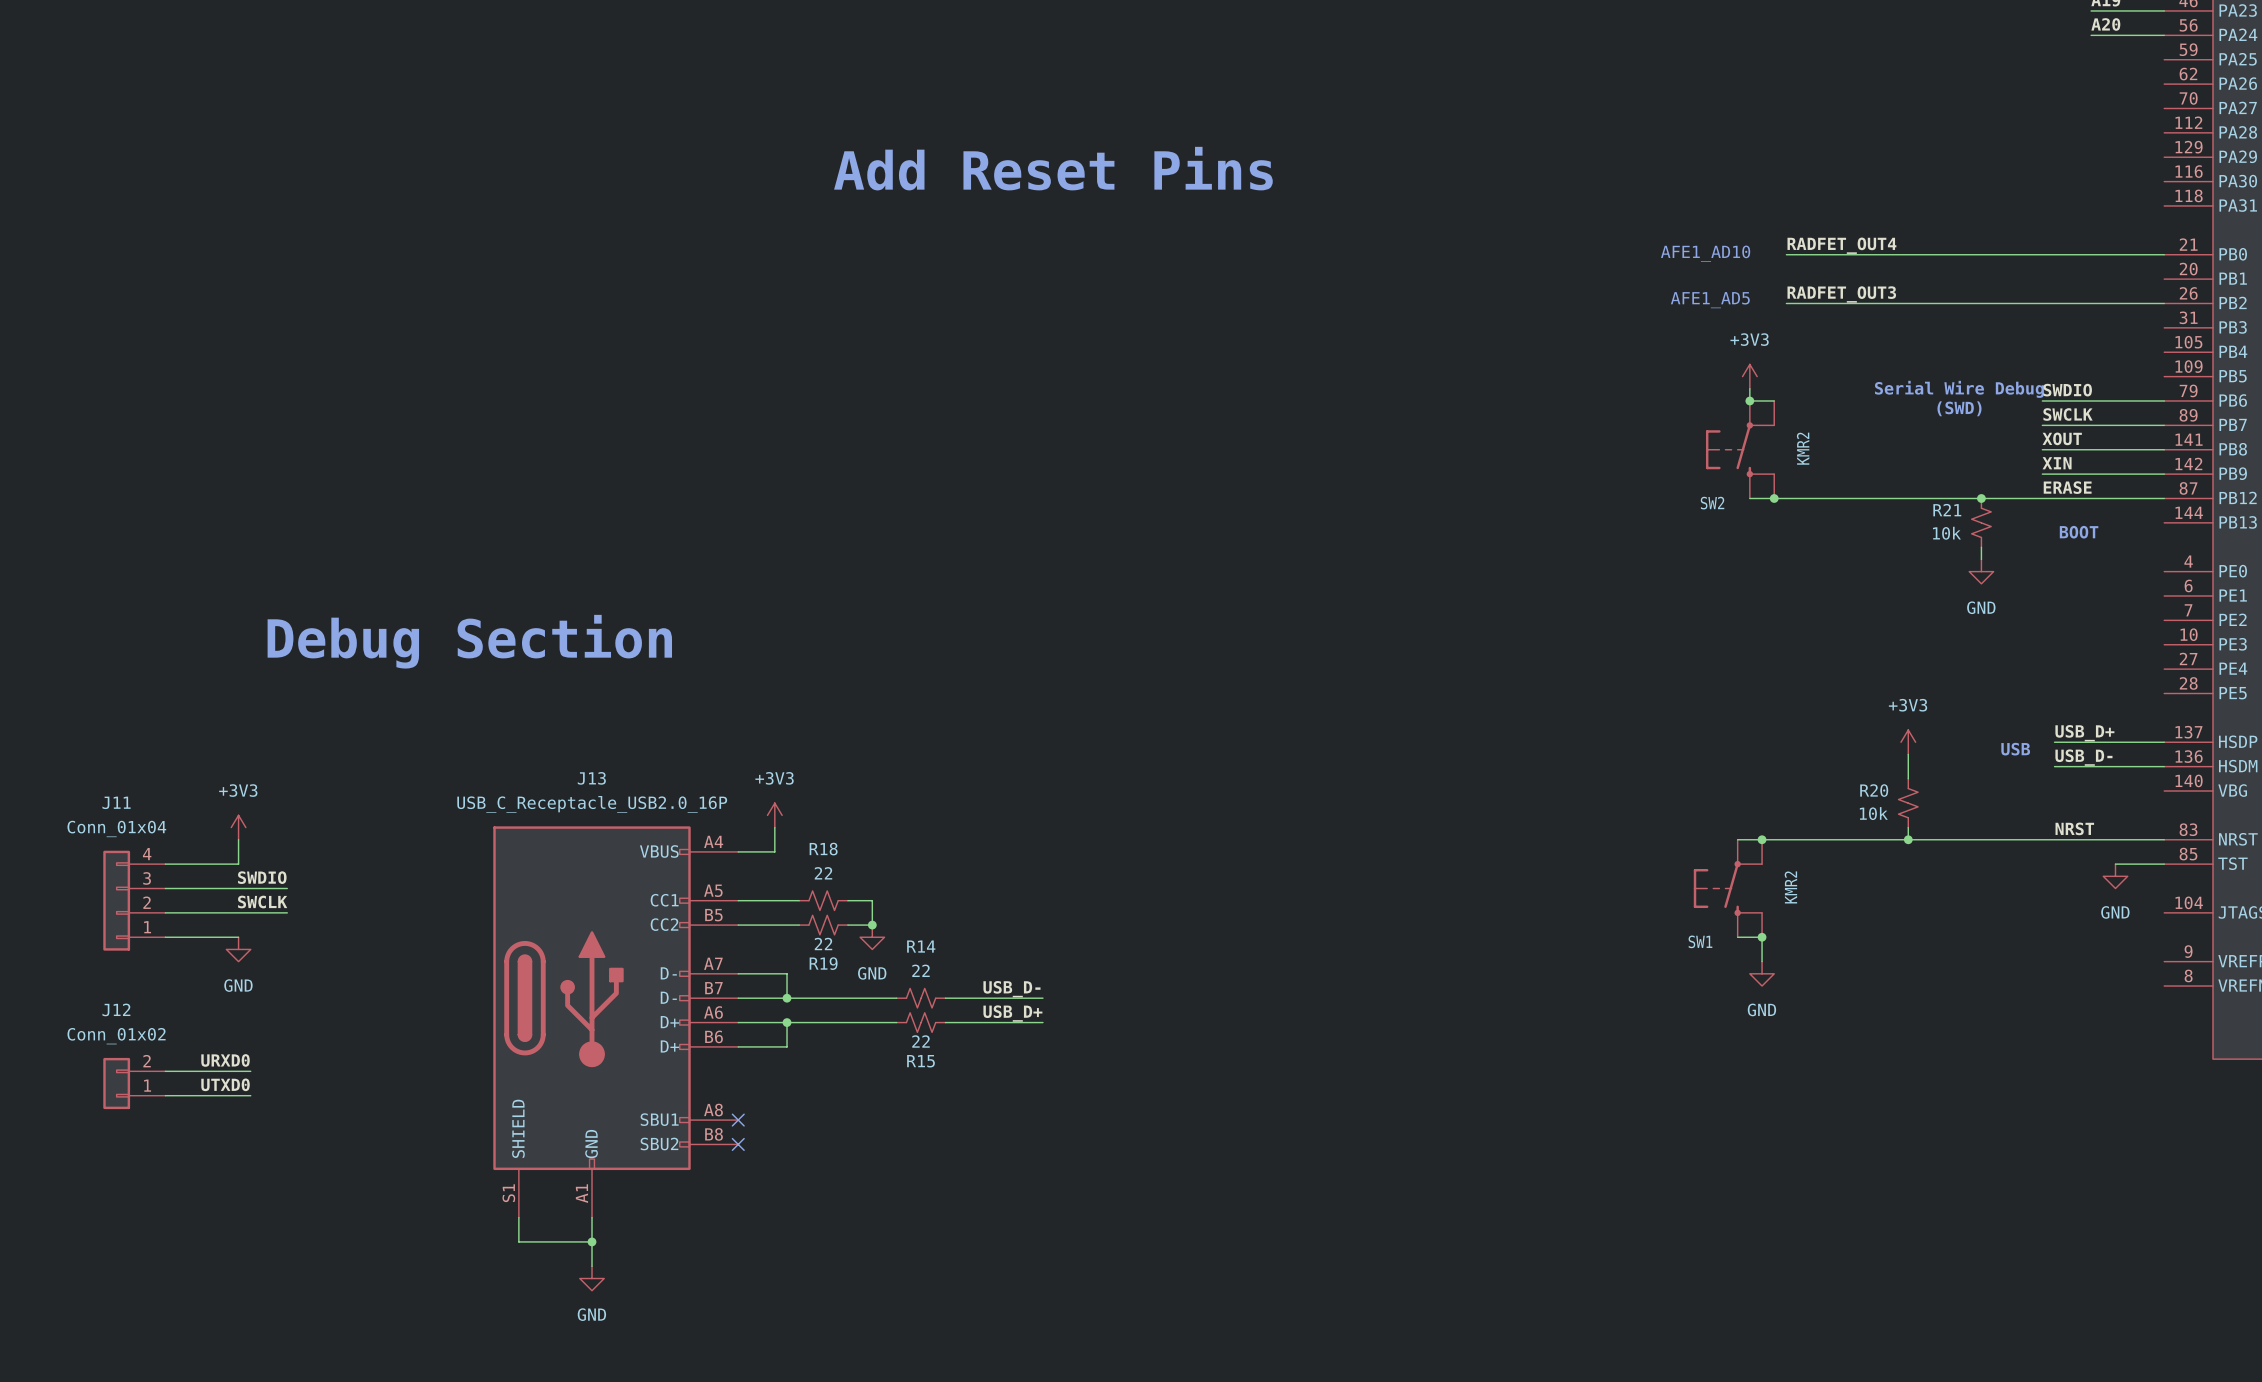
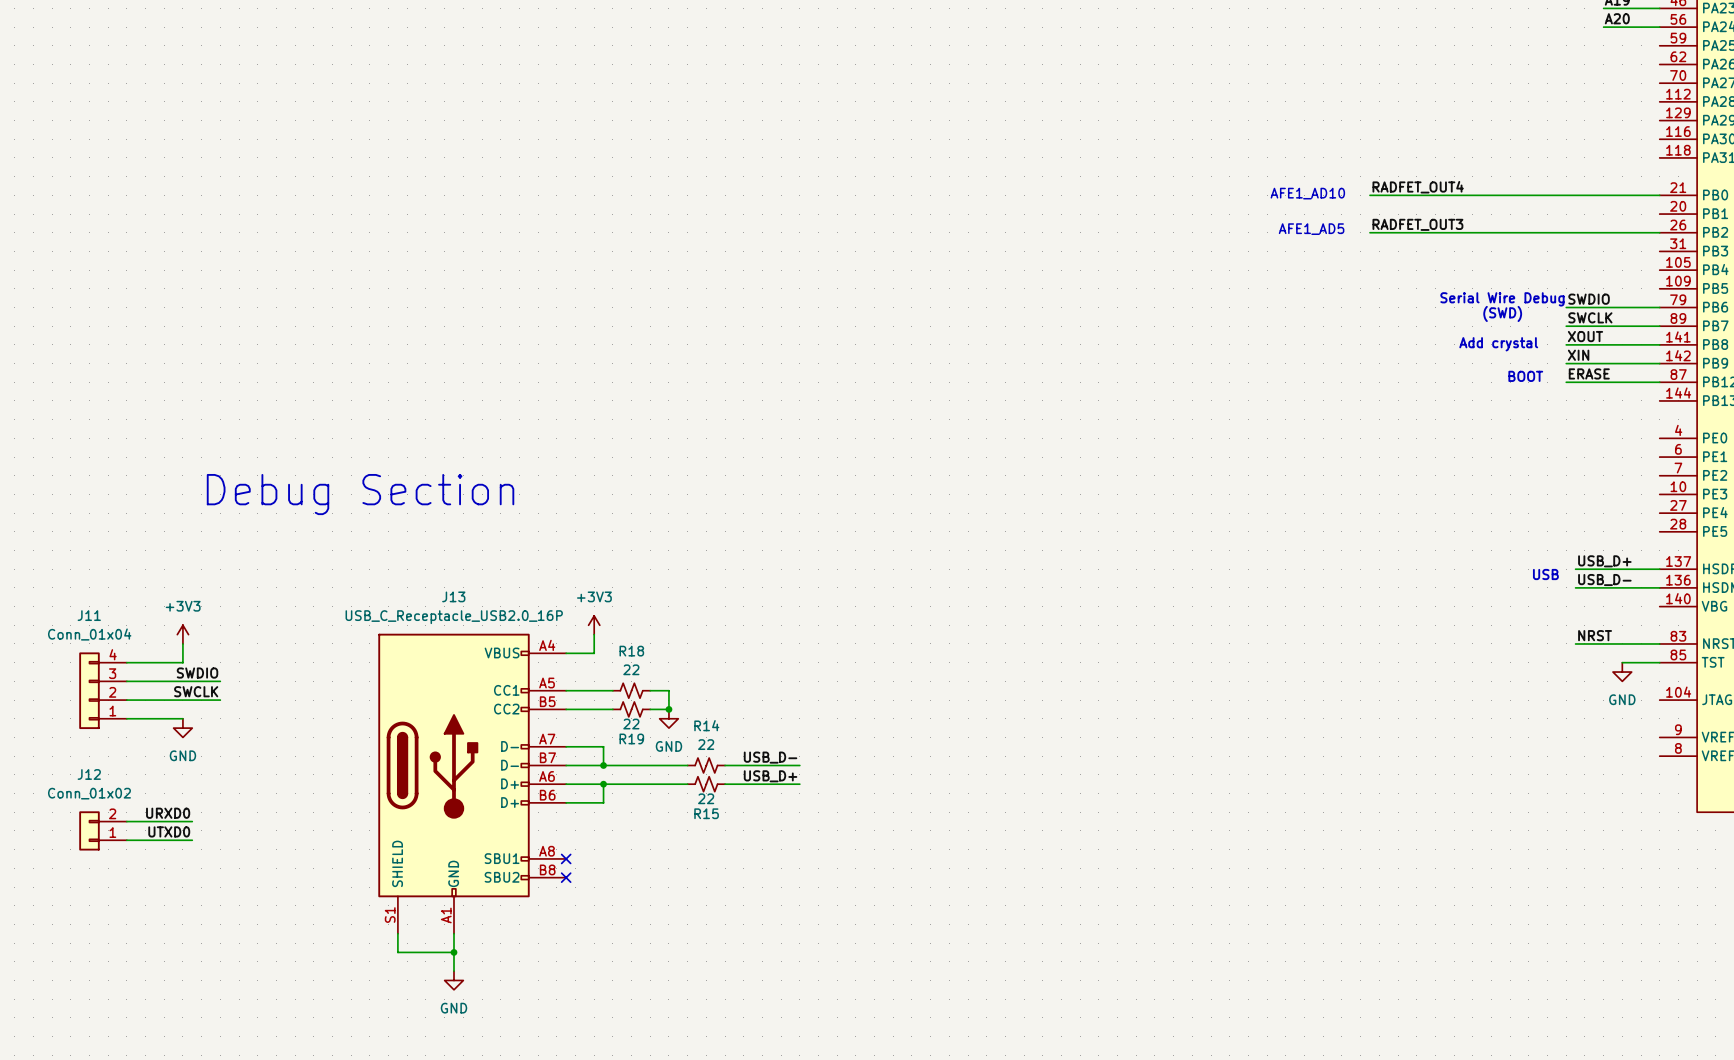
text: Add Reset Pins (1053, 168) -> none
power symbol: +3V3 (1749, 376) -> none
wire: (1749, 388) (1749, 400) (1774, 400) -> none
junction: (1749, 400) -> none
text: none -> Add crystal (1498, 344)
SW2: KMR2 (1740, 449) -> none
wire: (1749, 498) (2042, 498) -> none
junction: (1774, 498) -> none
junction: (1981, 498) -> none
R21: 10k (1981, 522) -> none
text position: BOOT (2079, 532) -> BOOT (1525, 376)
wire: (1981, 547) (1981, 559) -> none
power symbol: GND (1981, 571) -> none
power symbol: +3V3 (1908, 742) -> none
wire: (1908, 754) (1908, 778) -> none
R20: 10k (1908, 803) -> none
wire: (1908, 827) (1908, 839) -> none
wire: (1737, 839) (2054, 839) -> none
junction: (1762, 839) -> none
junction: (1908, 839) -> none
SW1: KMR2 (1728, 888) -> none
wire: (1737, 937) (1762, 937) (1762, 961) -> none
junction: (1762, 937) -> none
power symbol: GND (1762, 973) -> none

